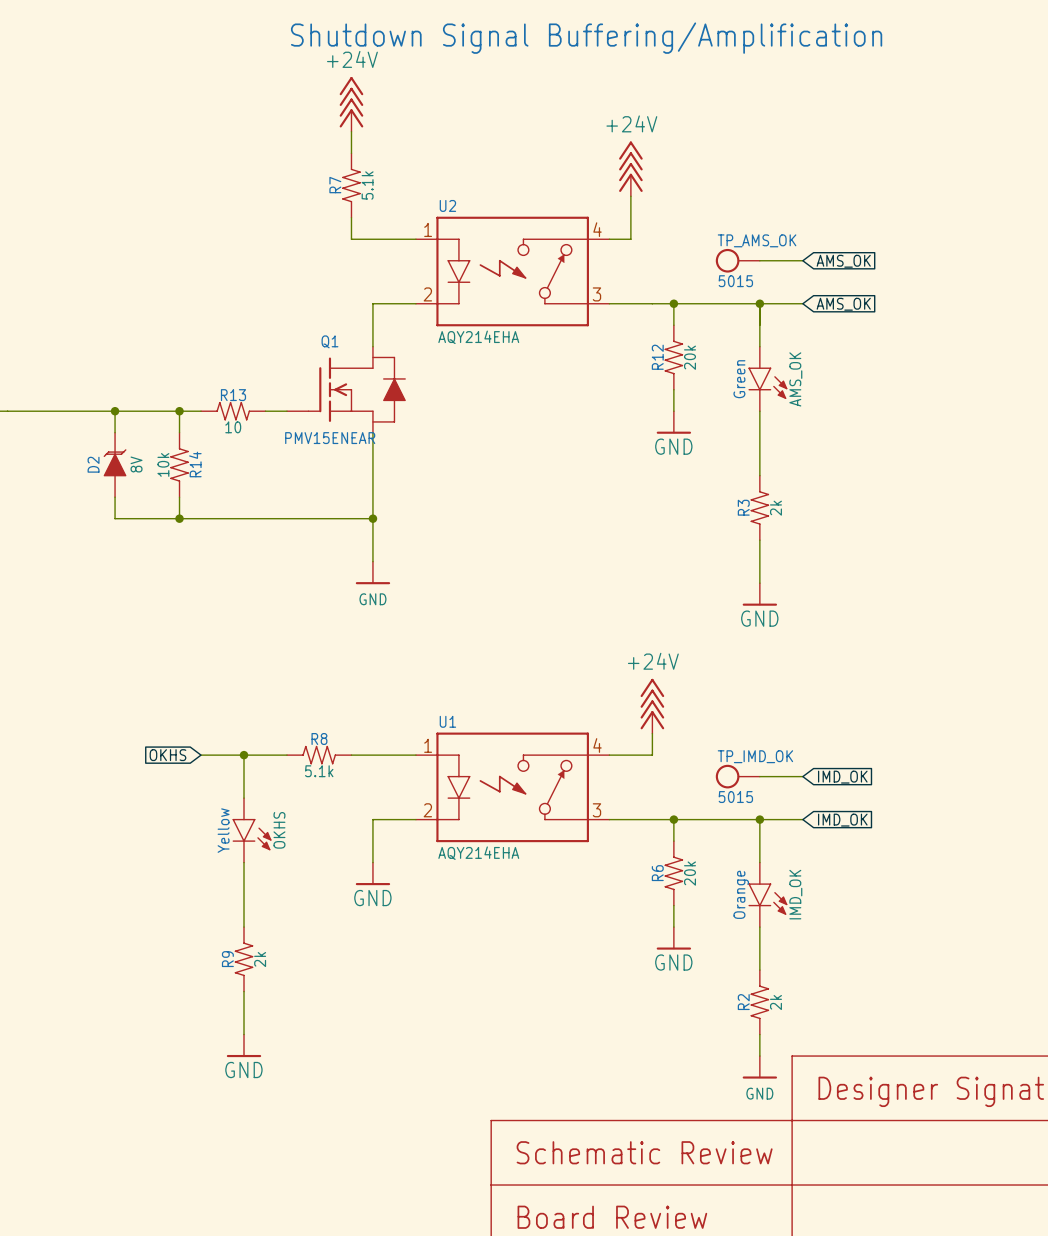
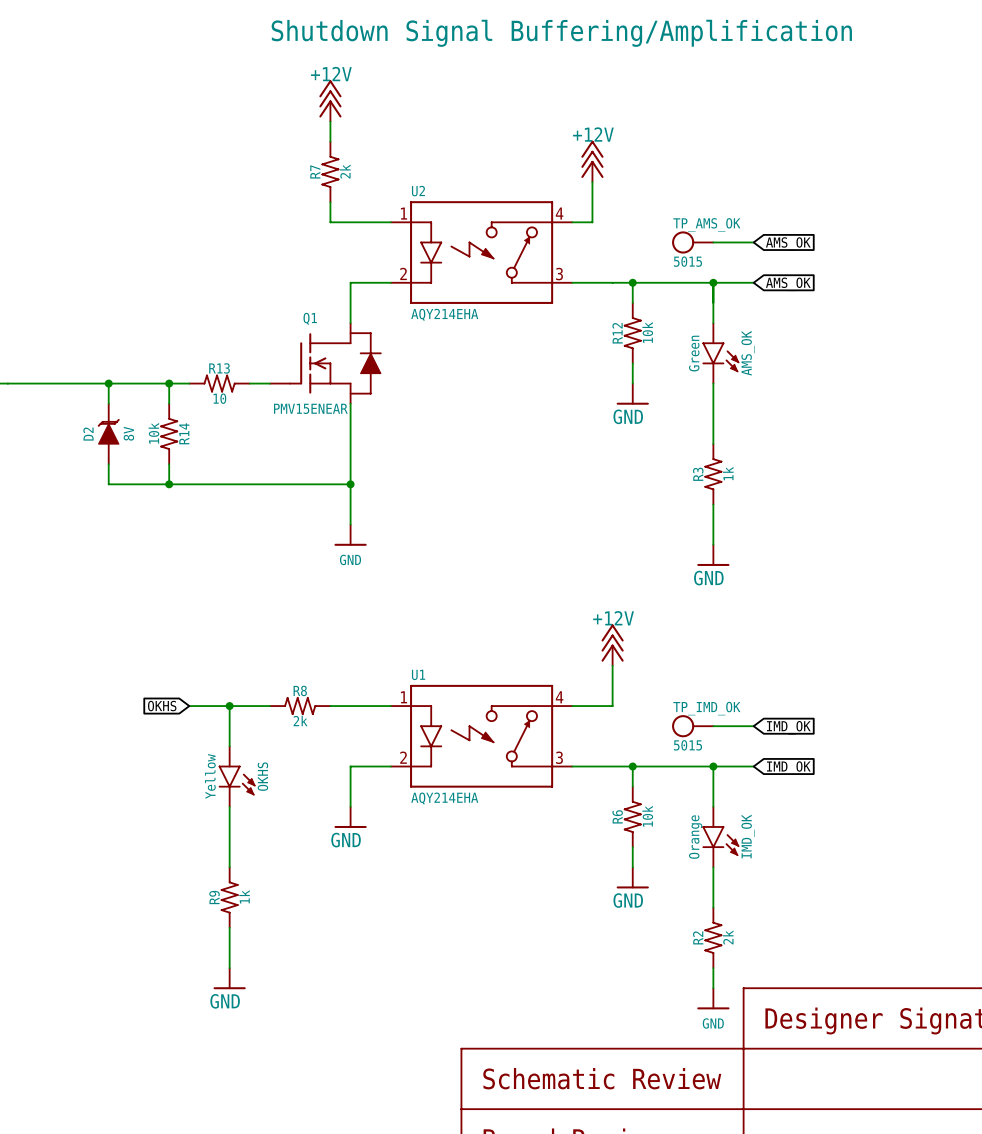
power symbol: +24V (351, 104) -> +12V (330, 100)
power symbol: +24V (630, 168) -> +12V (592, 161)
R7 text: 5.1k (367, 185) -> 2k (345, 171)
R12 text: 20k (690, 357) -> 10k (647, 332)
R3 text: 2k (775, 508) -> 1k (728, 473)
power symbol: none -> +12V (612, 645)
power symbol: +24V (652, 706) -> none
R8 text: 5.1k (319, 771) -> 2k (300, 720)
R6 text: 20k (690, 873) -> 10k (647, 816)
R9 text: 2k (260, 959) -> 1k (244, 896)

